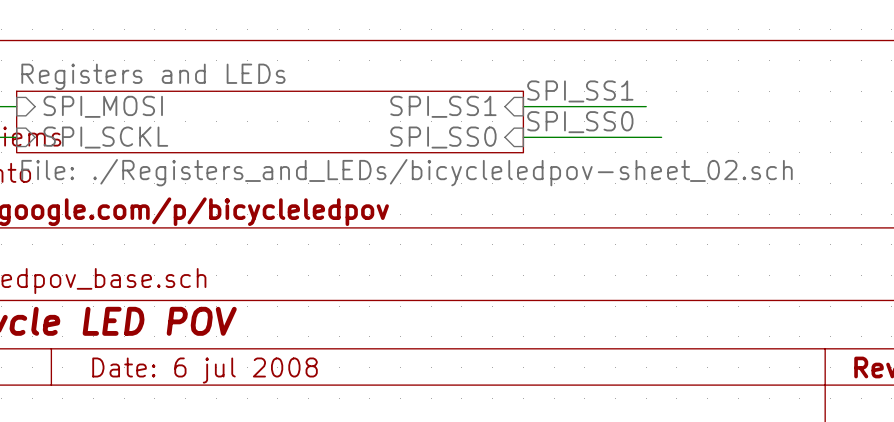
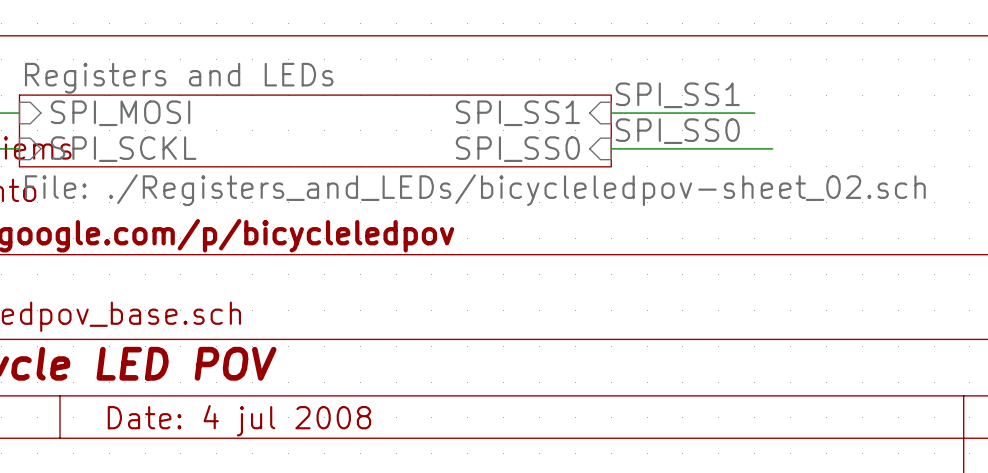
title block: Date: 6 jul 2008 (205, 370) -> Date: 4 jul 2008 (239, 420)

